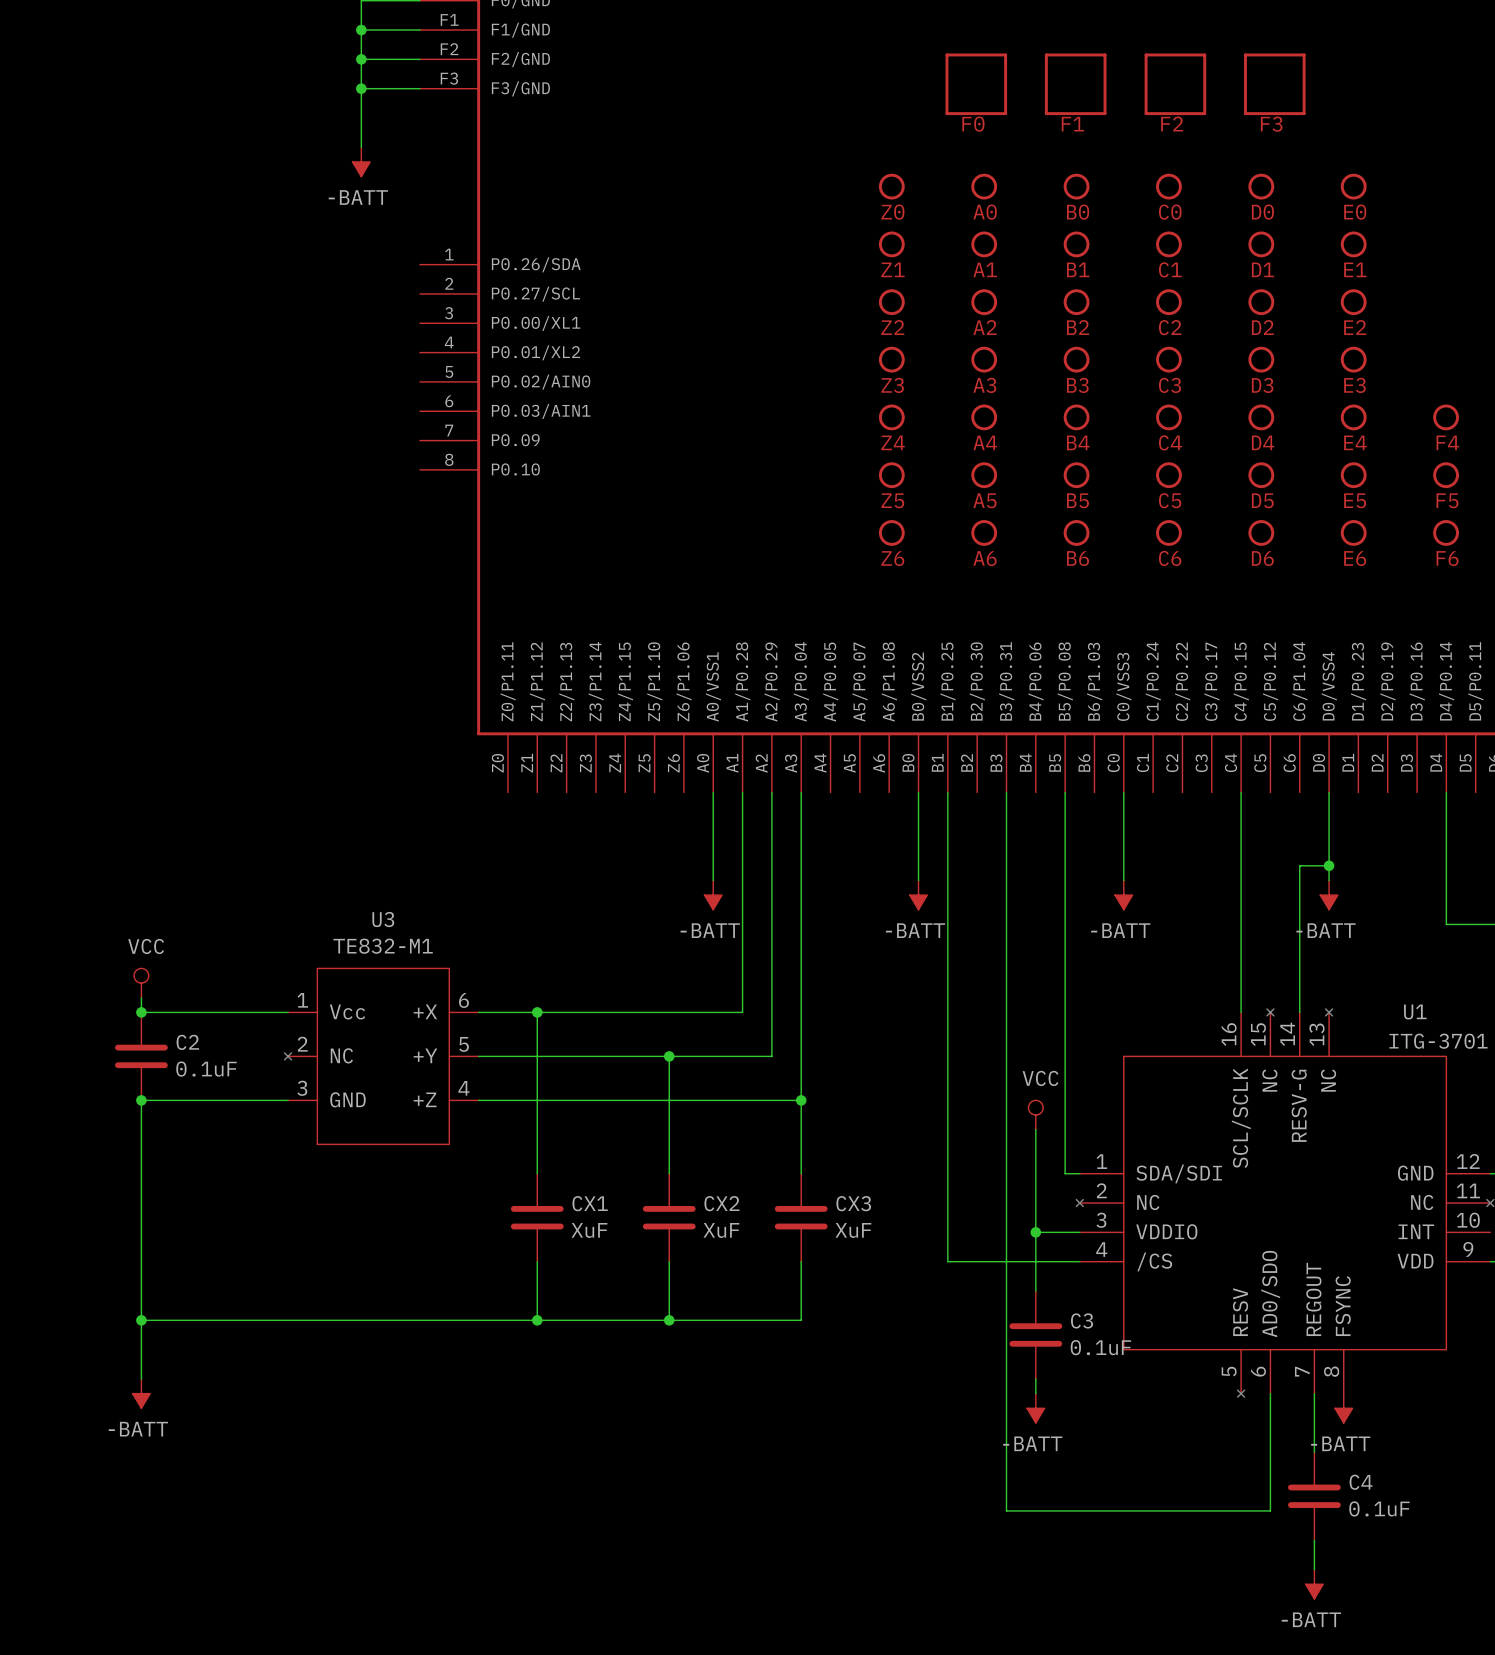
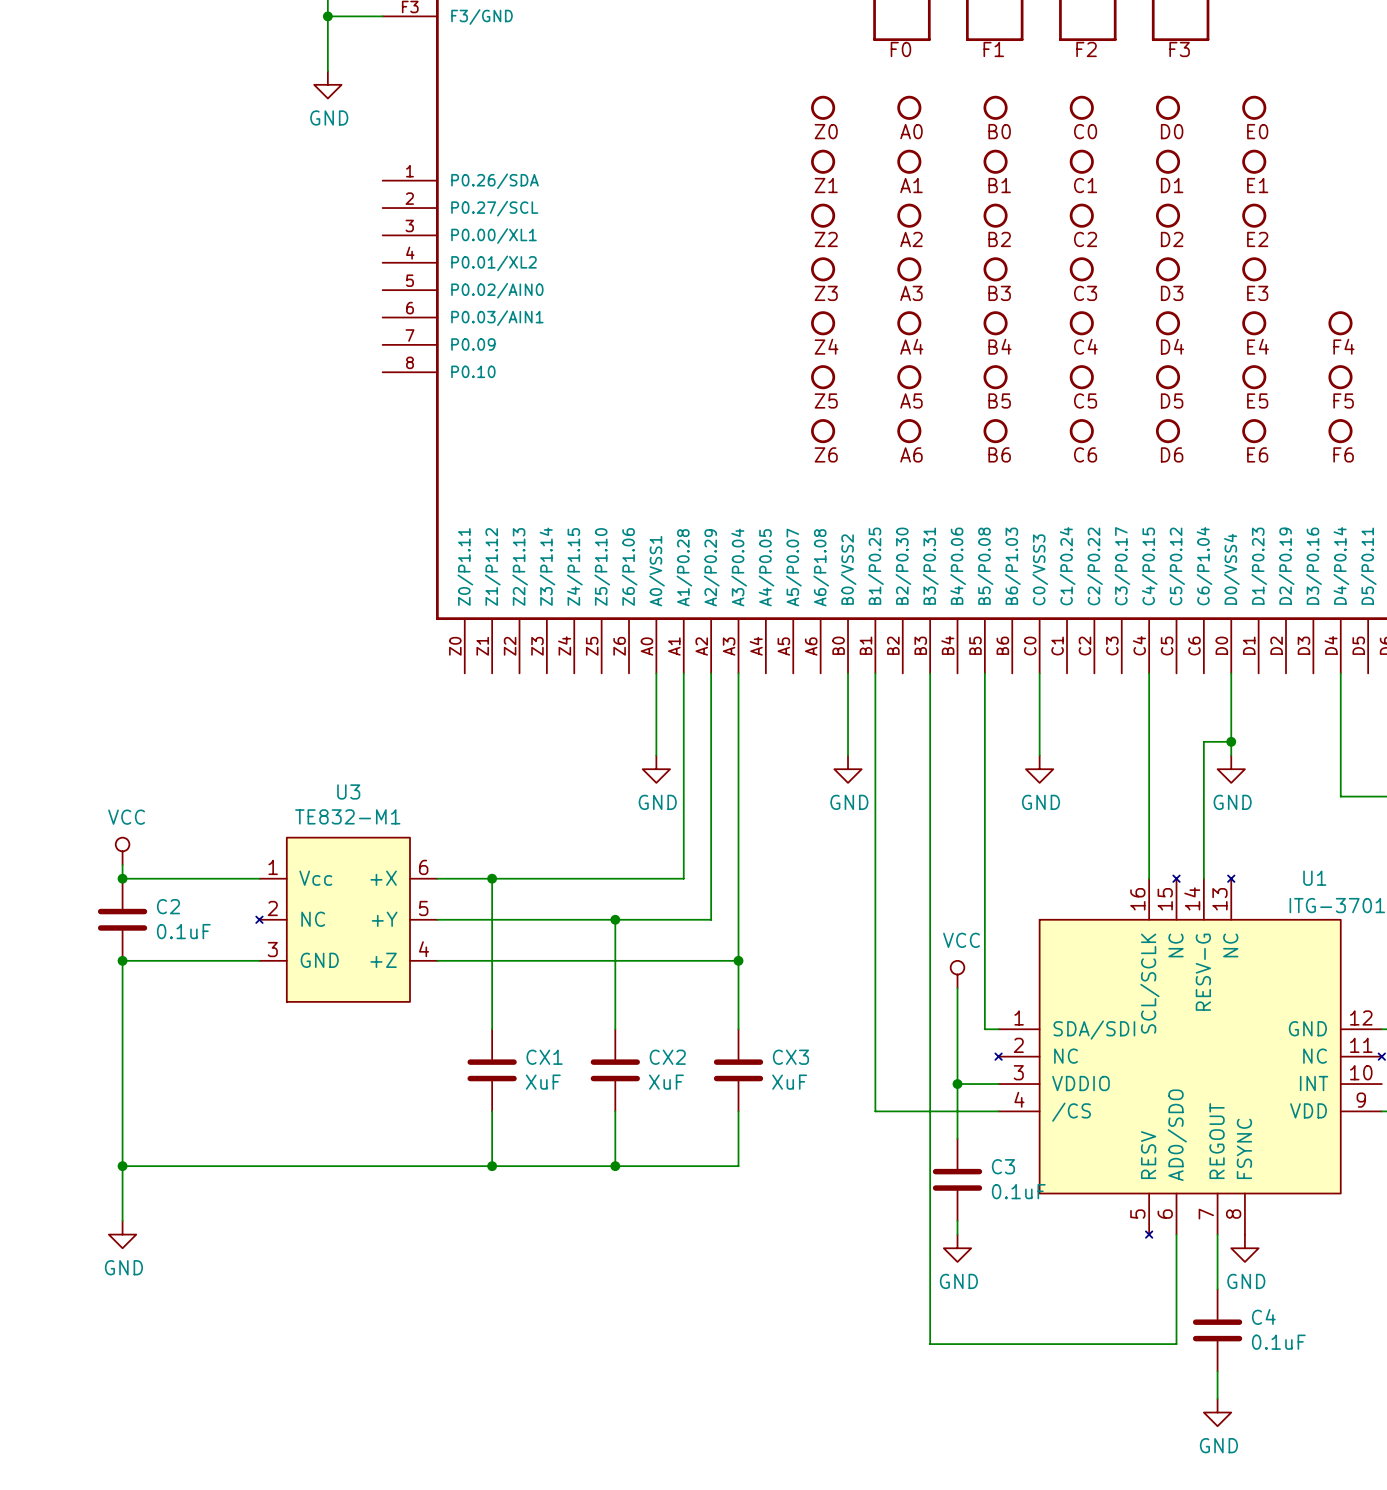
power symbol: -BATT (361, 161) -> GND (327, 84)
power symbol: -BATT (713, 895) -> GND (656, 769)
power symbol: -BATT (918, 895) -> GND (848, 769)
power symbol: -BATT (1123, 895) -> GND (1039, 769)
power symbol: -BATT (1329, 895) -> GND (1231, 769)
power symbol: -BATT (141, 1393) -> GND (122, 1234)
power symbol: -BATT (1035, 1408) -> GND (957, 1248)
power symbol: -BATT (1343, 1408) -> GND (1244, 1248)
power symbol: -BATT (1314, 1584) -> GND (1217, 1412)

